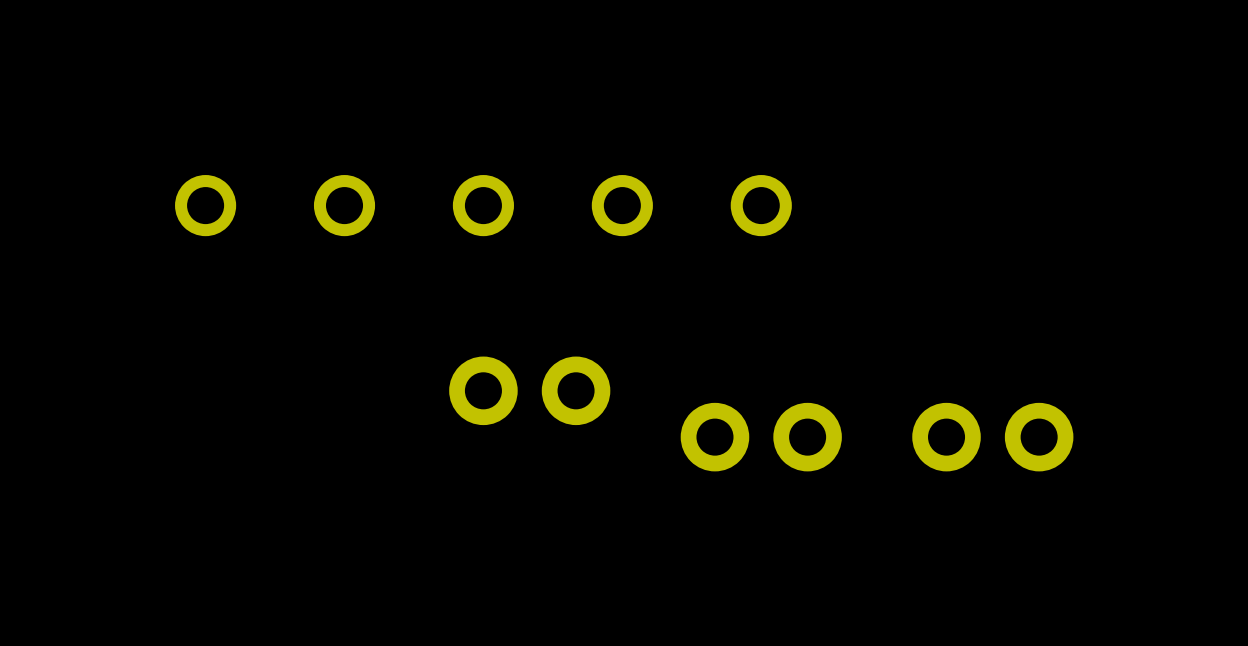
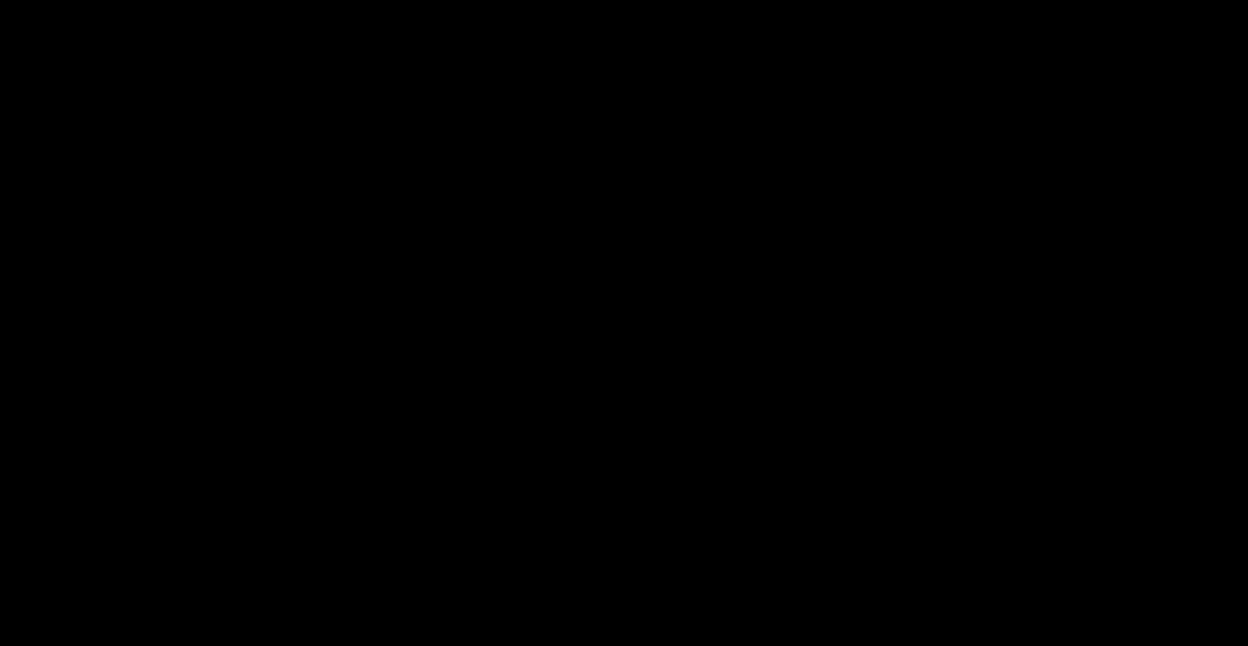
part: (205, 205) -> none
part: (344, 205) -> none
part: (483, 205) -> none
part: (622, 205) -> none
part: (761, 205) -> none
part: (529, 390) -> none
part: (761, 437) -> none
part: (992, 437) -> none

